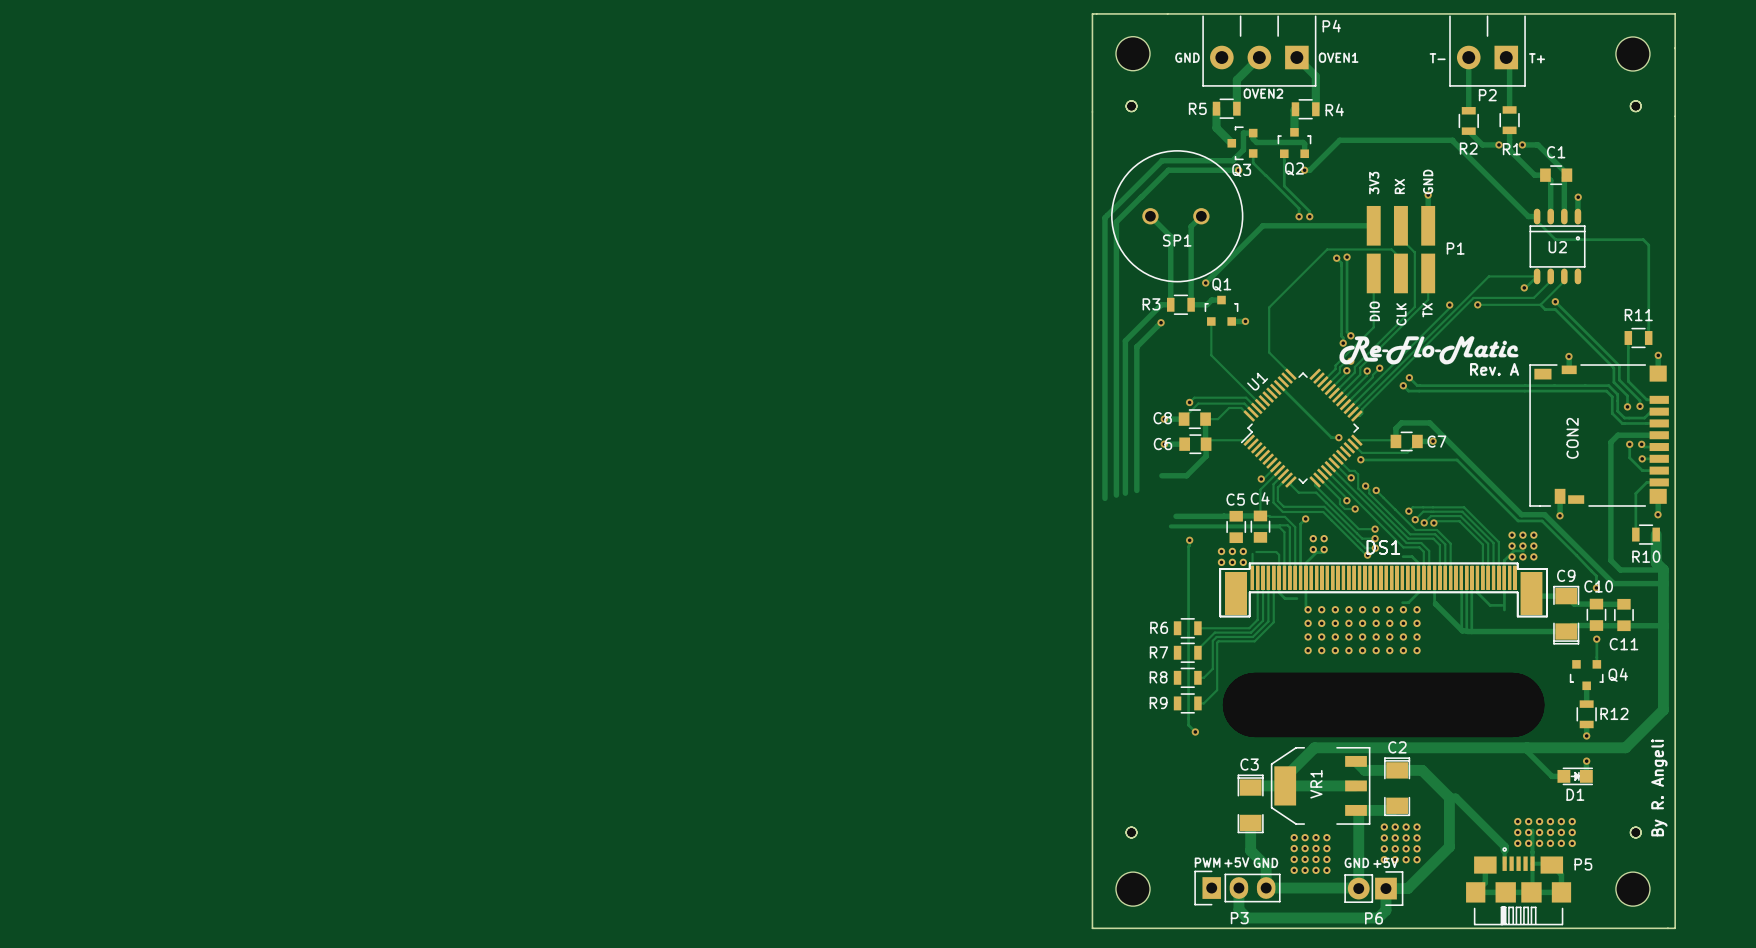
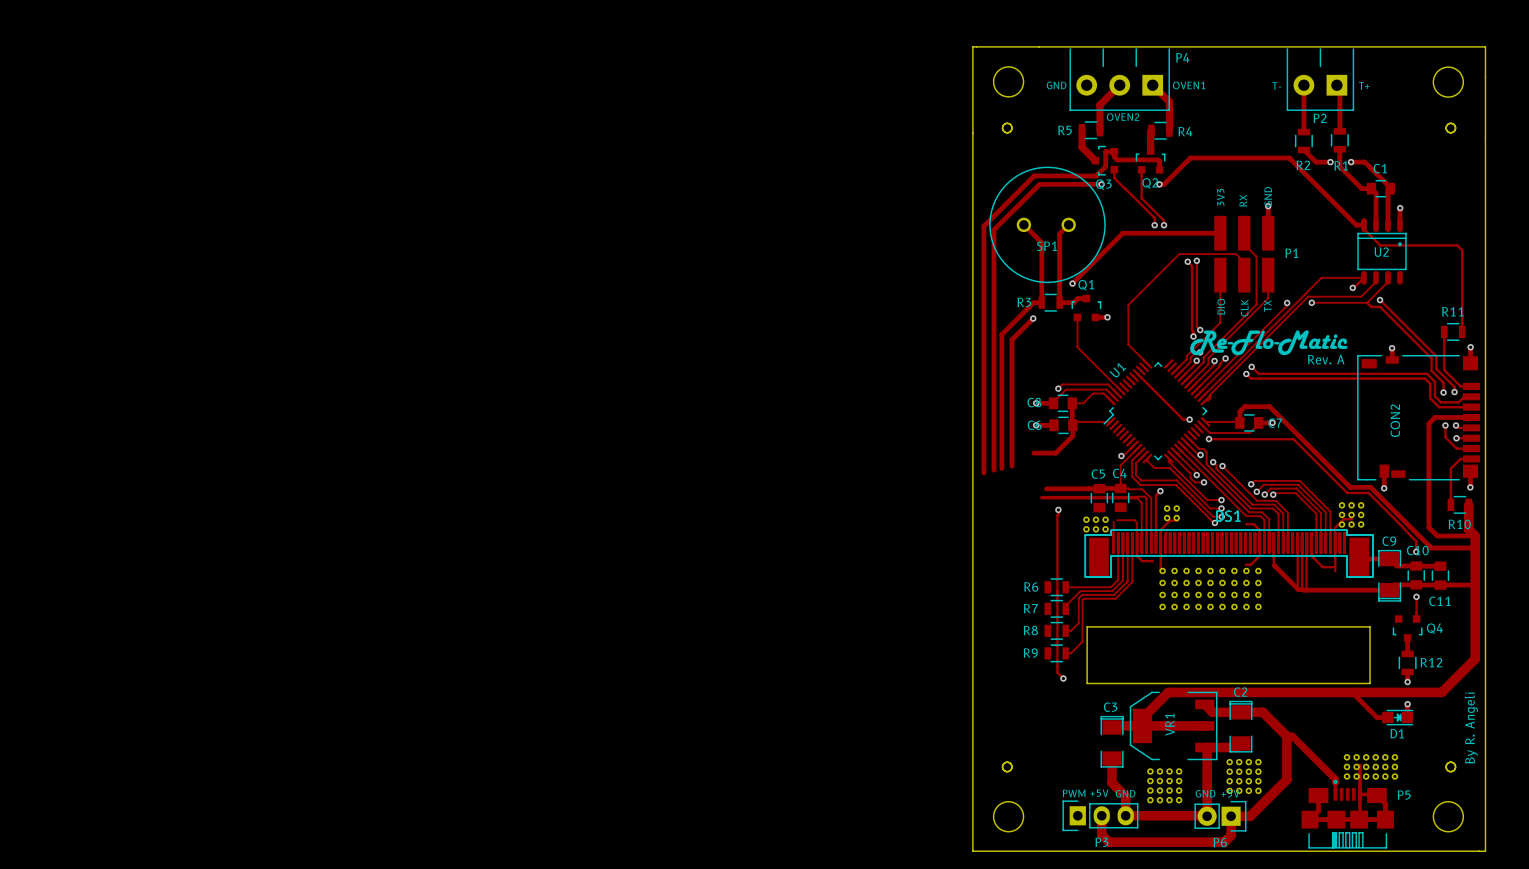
DS1 footprint: [1126, 100, 1642, 838] -> [1002, 123, 1456, 772]
board edge: none -> (1087, 626) (1087, 683) (1370, 683) (1370, 626) (1087, 626)

